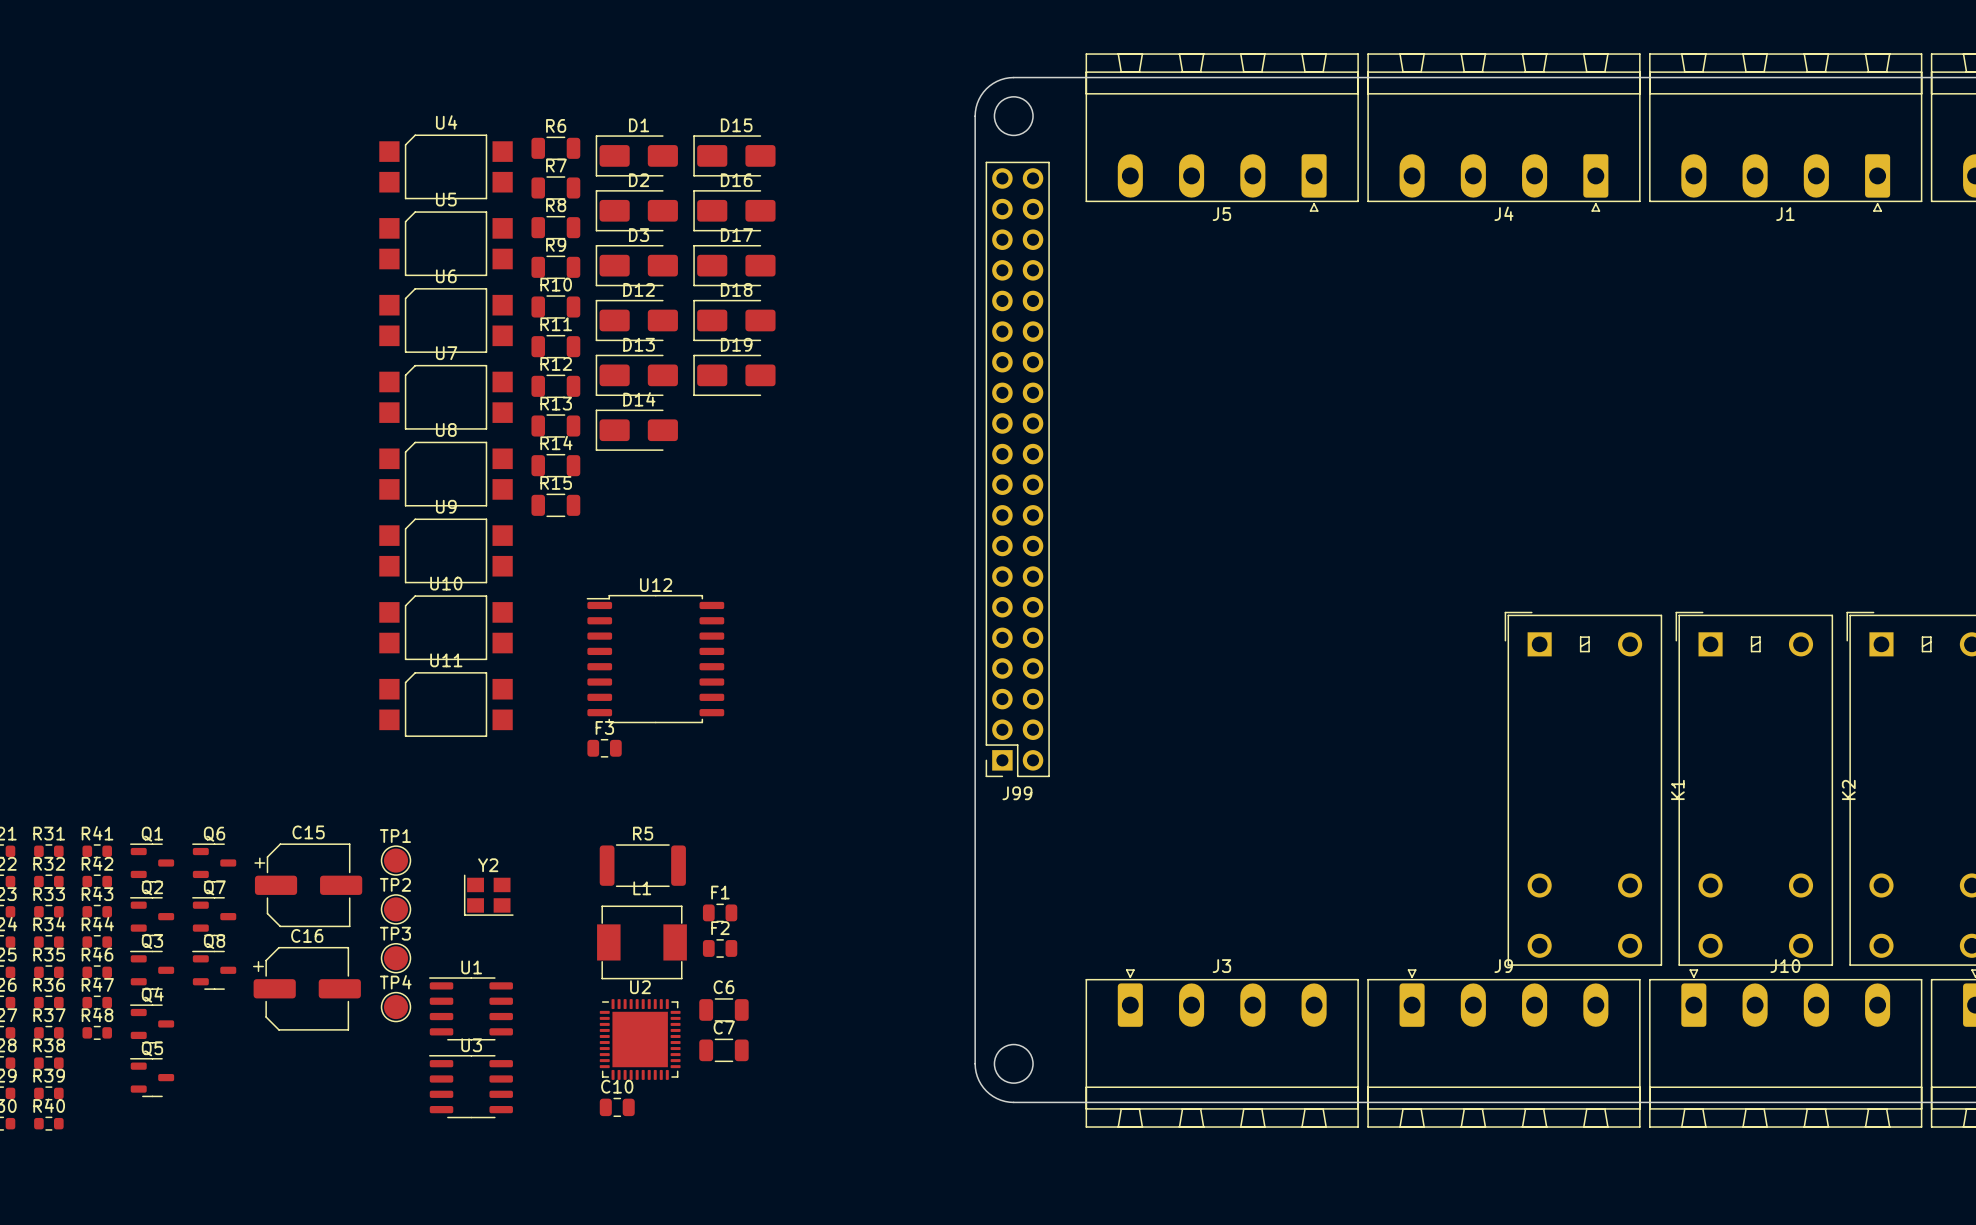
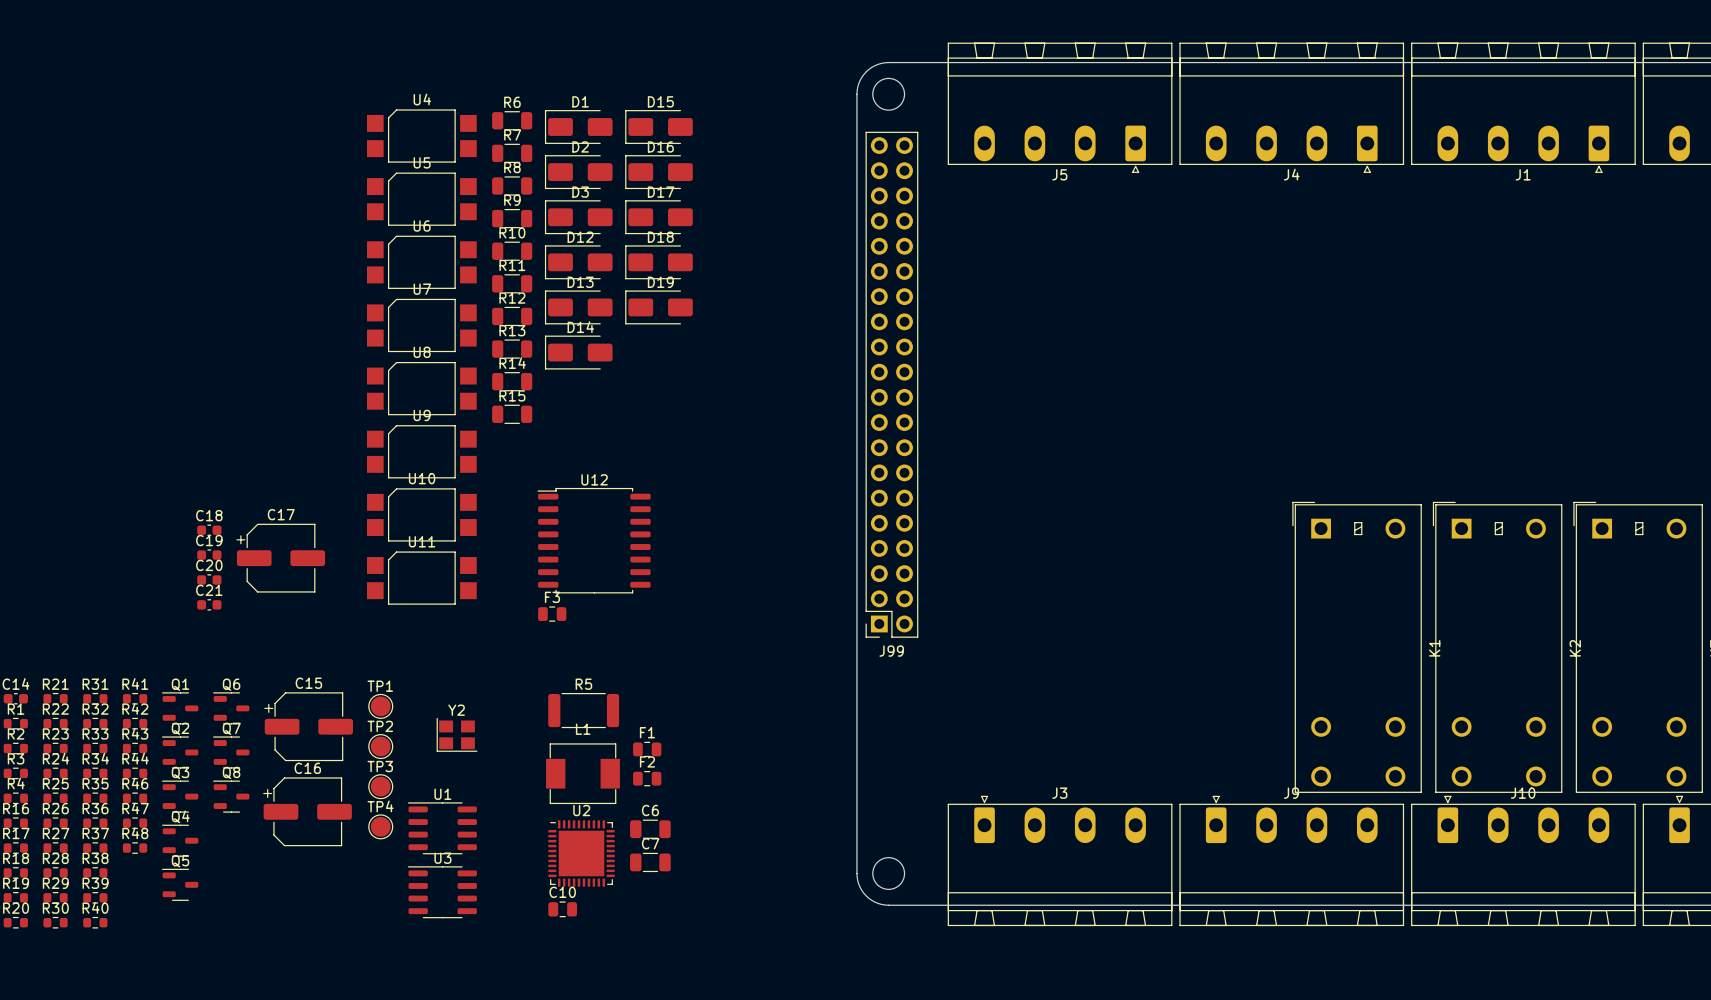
C18: none -> (209, 530)
C19: none -> (209, 555)
C17: none -> (280, 558)
C20: none -> (209, 579)
C21: none -> (209, 604)

